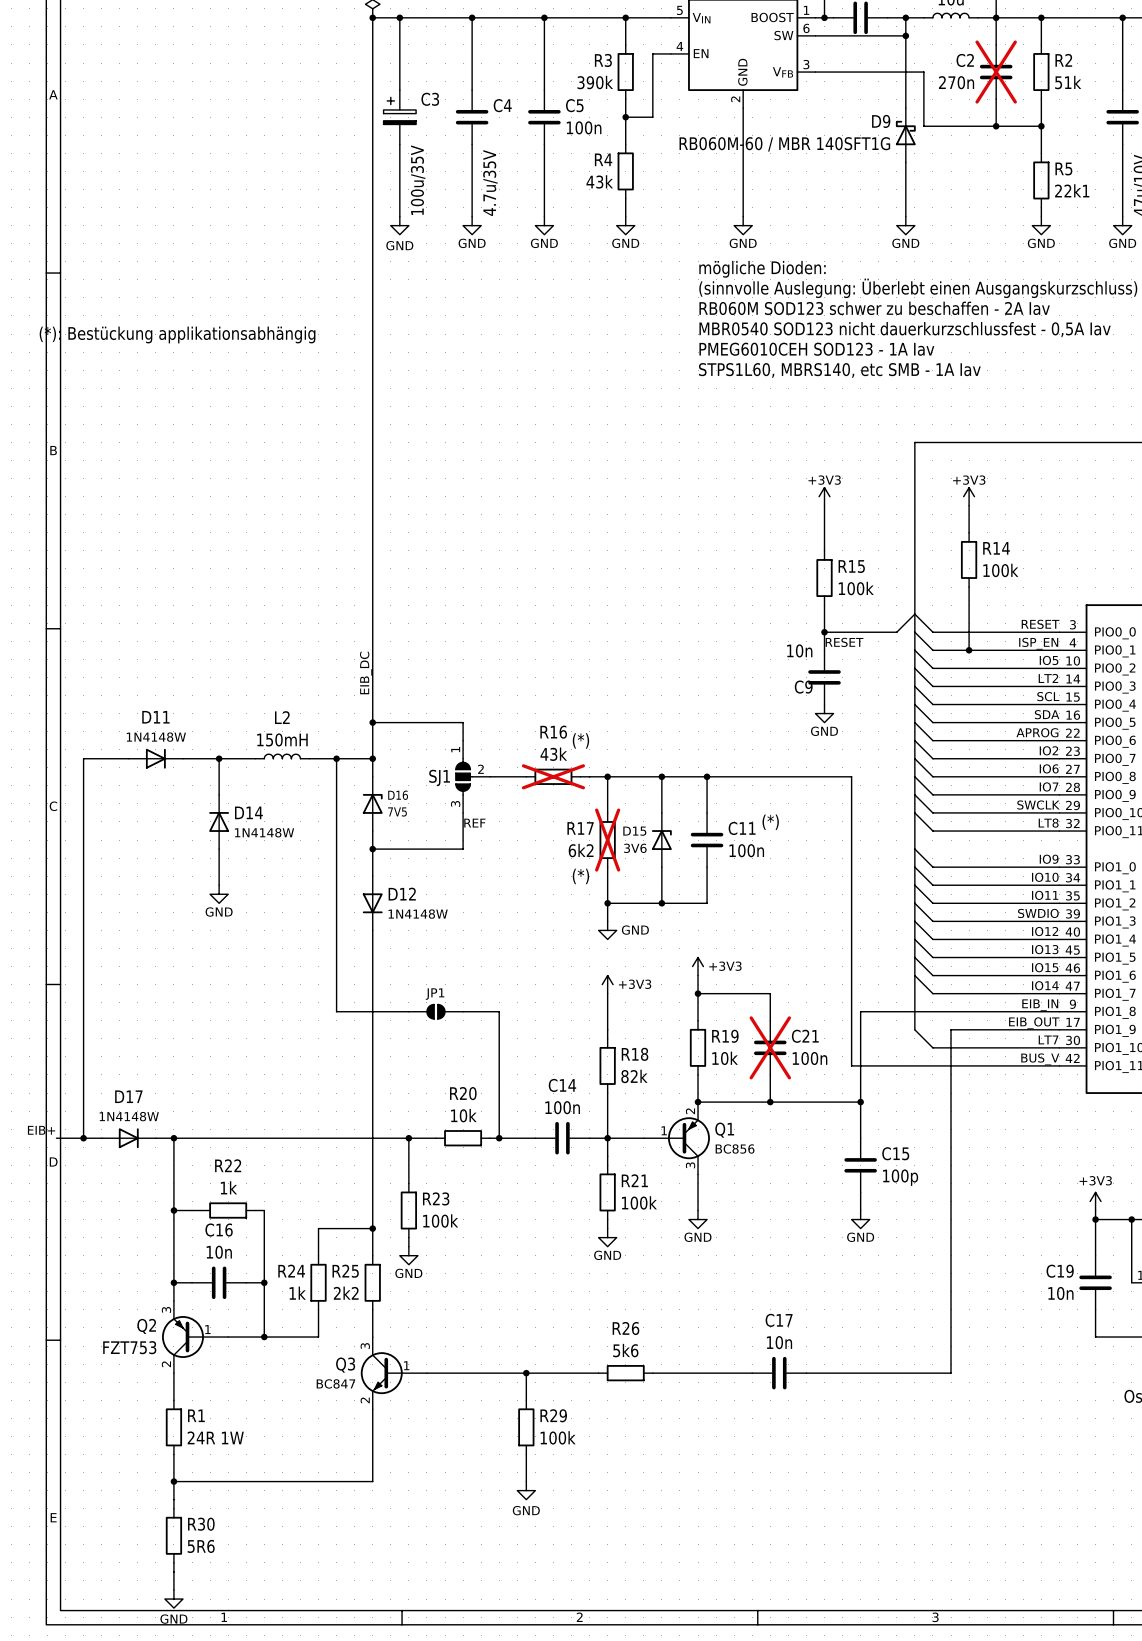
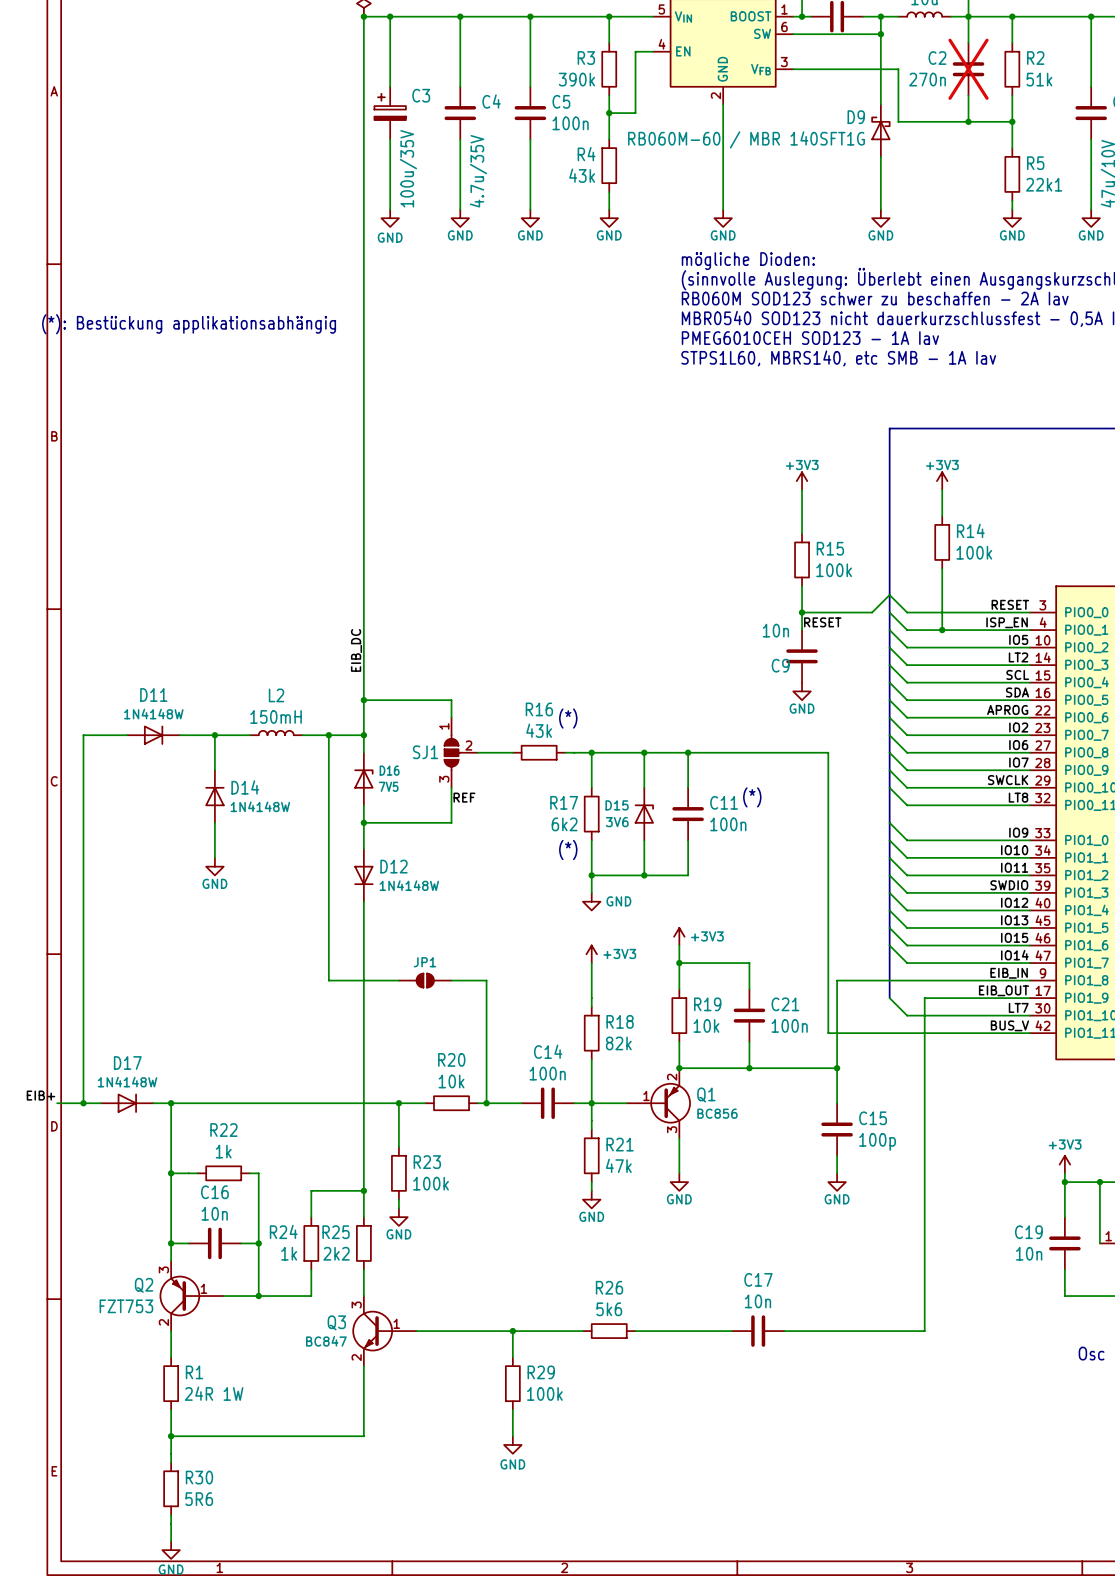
R16 do-not-place cross: (553, 776) -> none
R17 do-not-place cross: (607, 840) -> none
C21 do-not-place cross: (770, 1047) -> none
R21 value: 100k (639, 1202) -> 47k (618, 1165)

